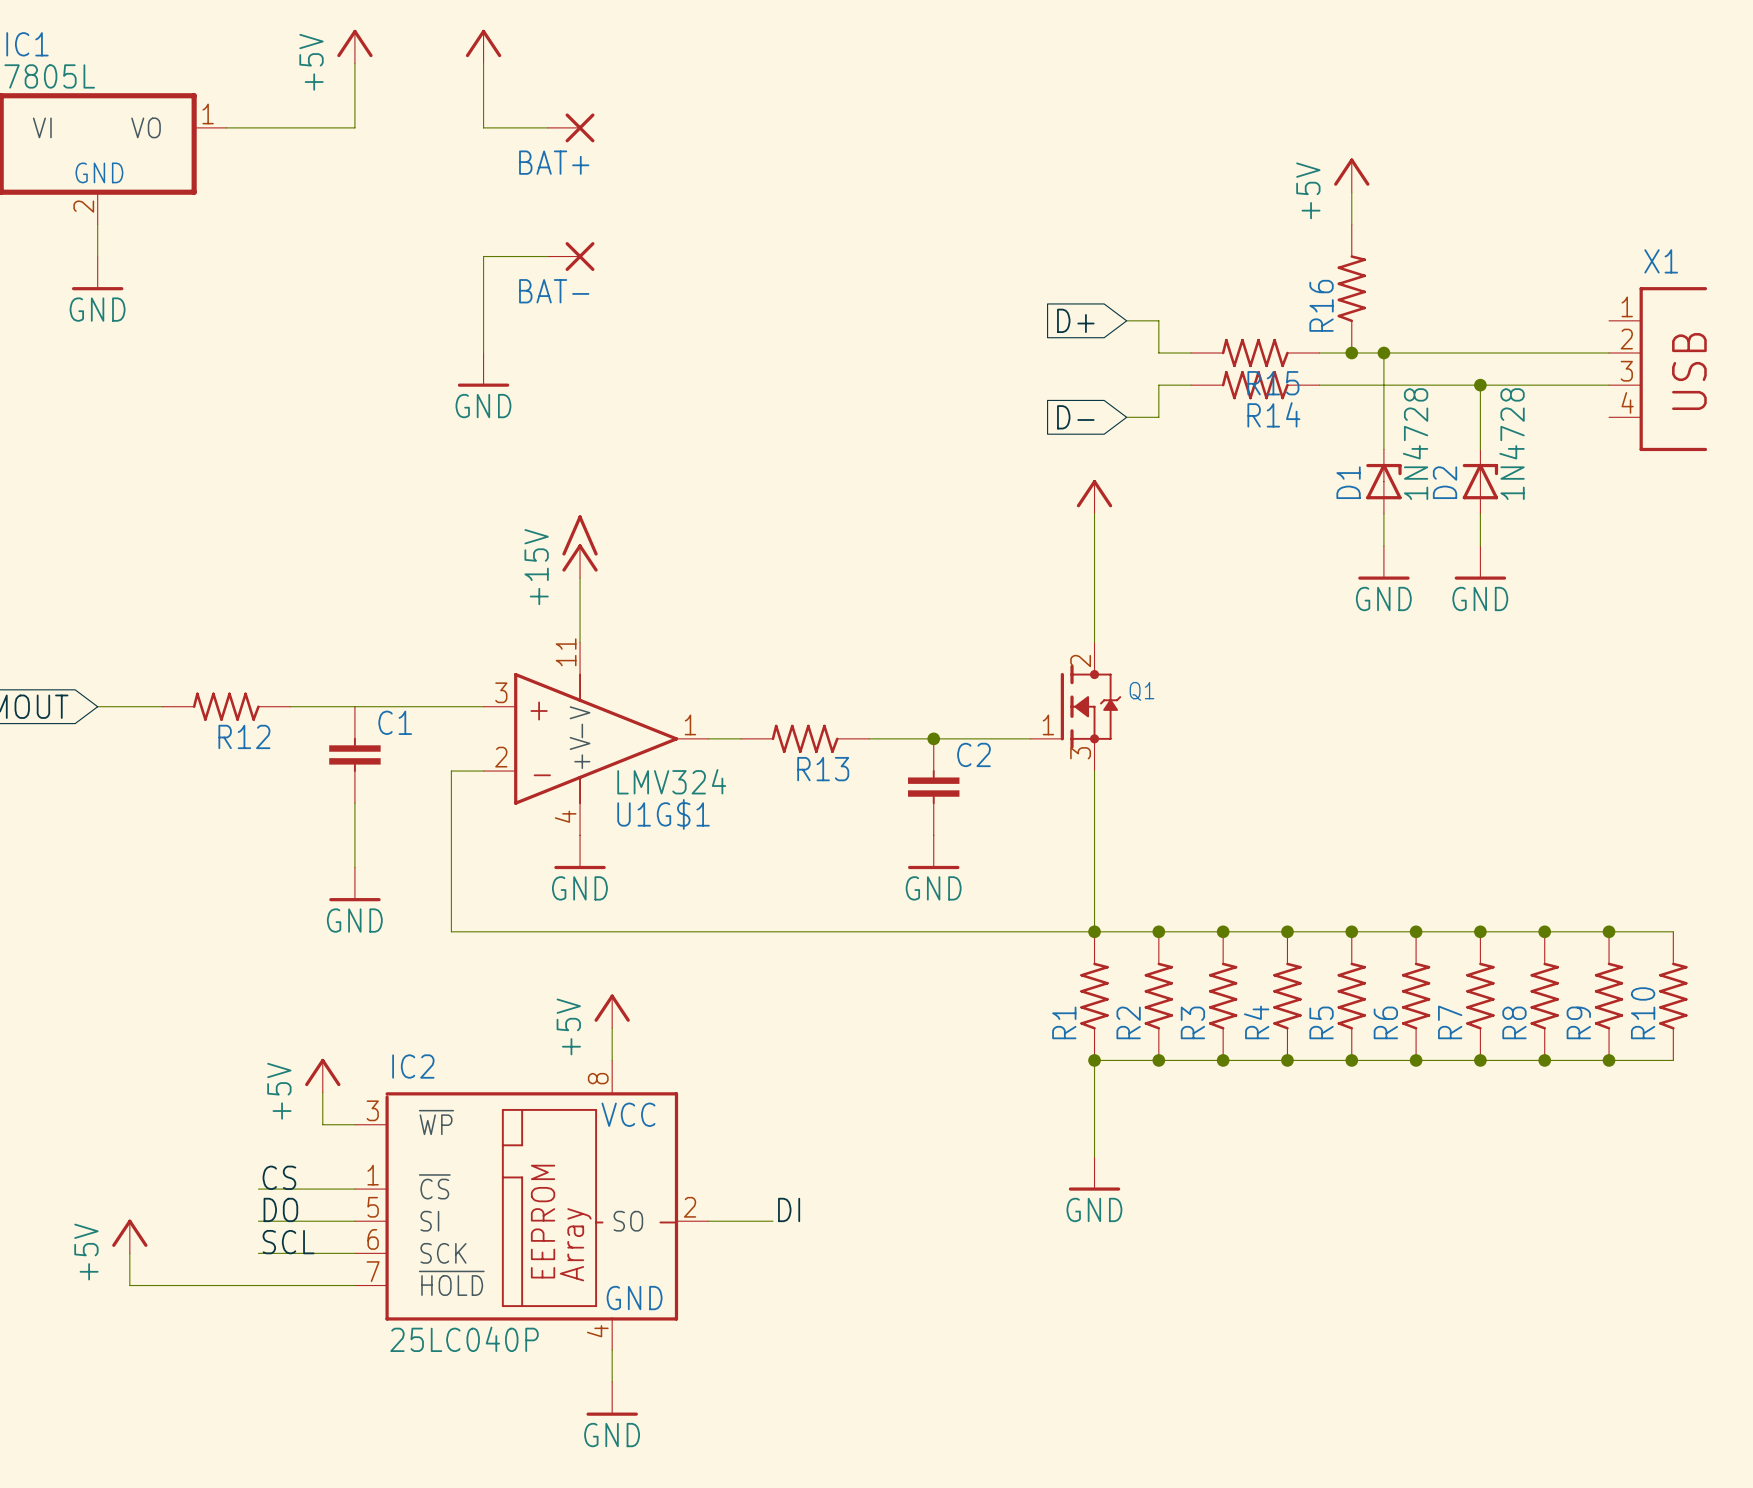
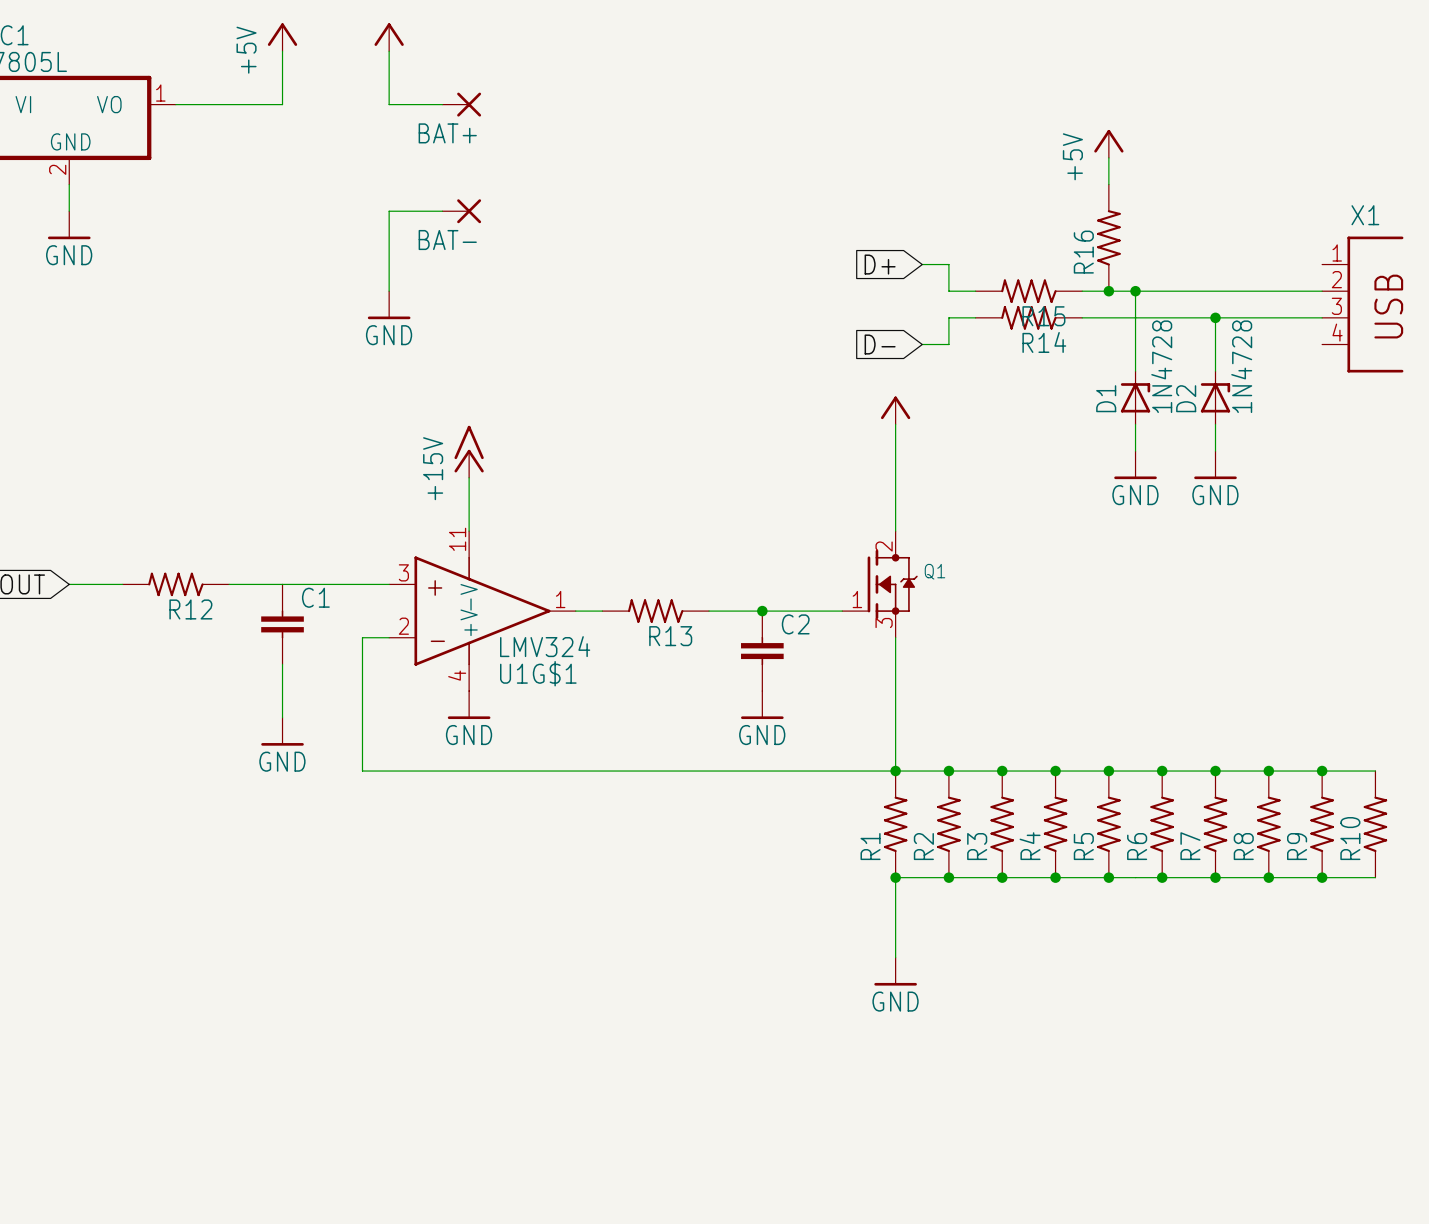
power symbol: +5V (612, 1011) -> none
wire: (612, 1028) (612, 1060) -> none
power symbol: +5V (322, 1075) -> none
wire: (322, 1092) (322, 1124) (354, 1124) -> none
label: CS (279, 1177) -> none
wire: (258, 1189) (354, 1189) -> none
IC2: 25LC040P (531, 1205) -> none
label: DO (280, 1209) -> none
label: DI (789, 1209) -> none
wire: (258, 1221) (354, 1221) -> none
wire: (708, 1221) (772, 1221) -> none
power symbol: +5V (129, 1236) -> none
label: SCL (288, 1242) -> none
wire: (129, 1253) (129, 1285) (354, 1285) -> none
wire: (258, 1253) (354, 1253) -> none
wire: (612, 1349) (612, 1381) -> none
power symbol: GND (612, 1398) -> none

